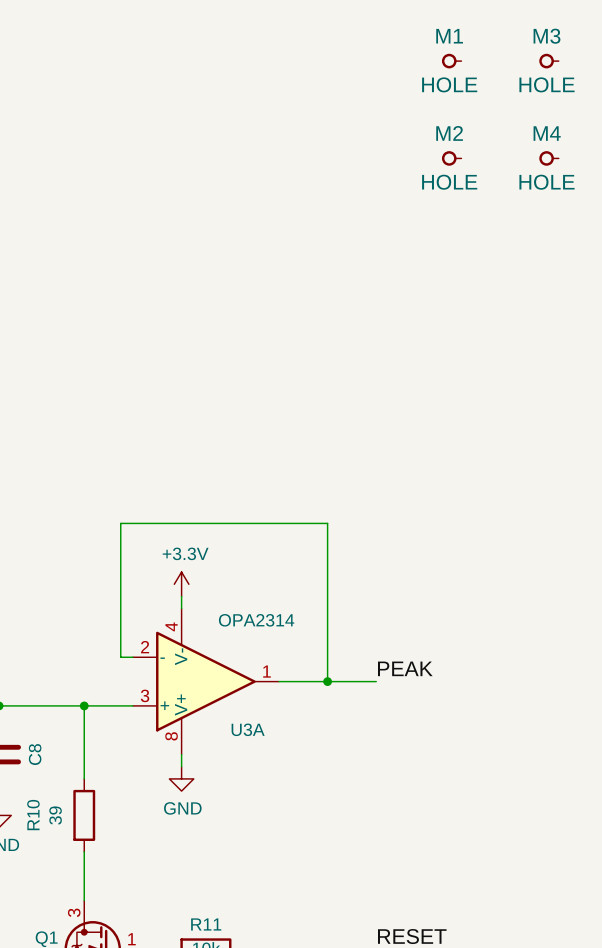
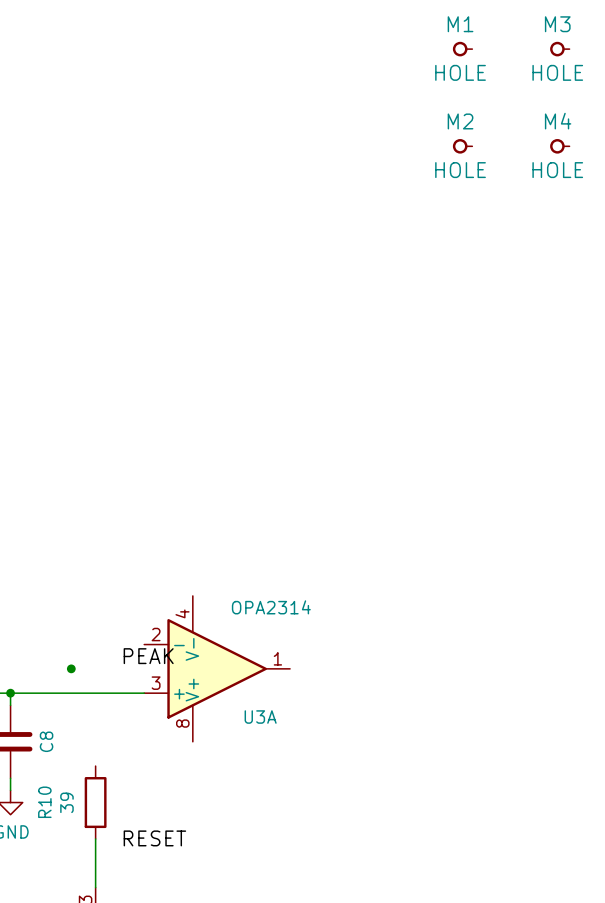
power symbol: +3.3V (181, 584) -> none
wire: (181, 596) (181, 608) -> none
wire: (132, 657) (120, 657) (120, 523) (327, 523) (327, 681) -> none
label: none -> PEAK (148, 656)
label: PEAK (405, 668) -> none
wire: (278, 681) (376, 681) -> none
junction: (327, 681) -> none
wire: (84, 705) (84, 778) -> none
junction position: (84, 705) -> (71, 668)
wire: (181, 754) (181, 766) -> none
power symbol: GND (181, 778) -> none
label: none -> RESET (154, 838)

